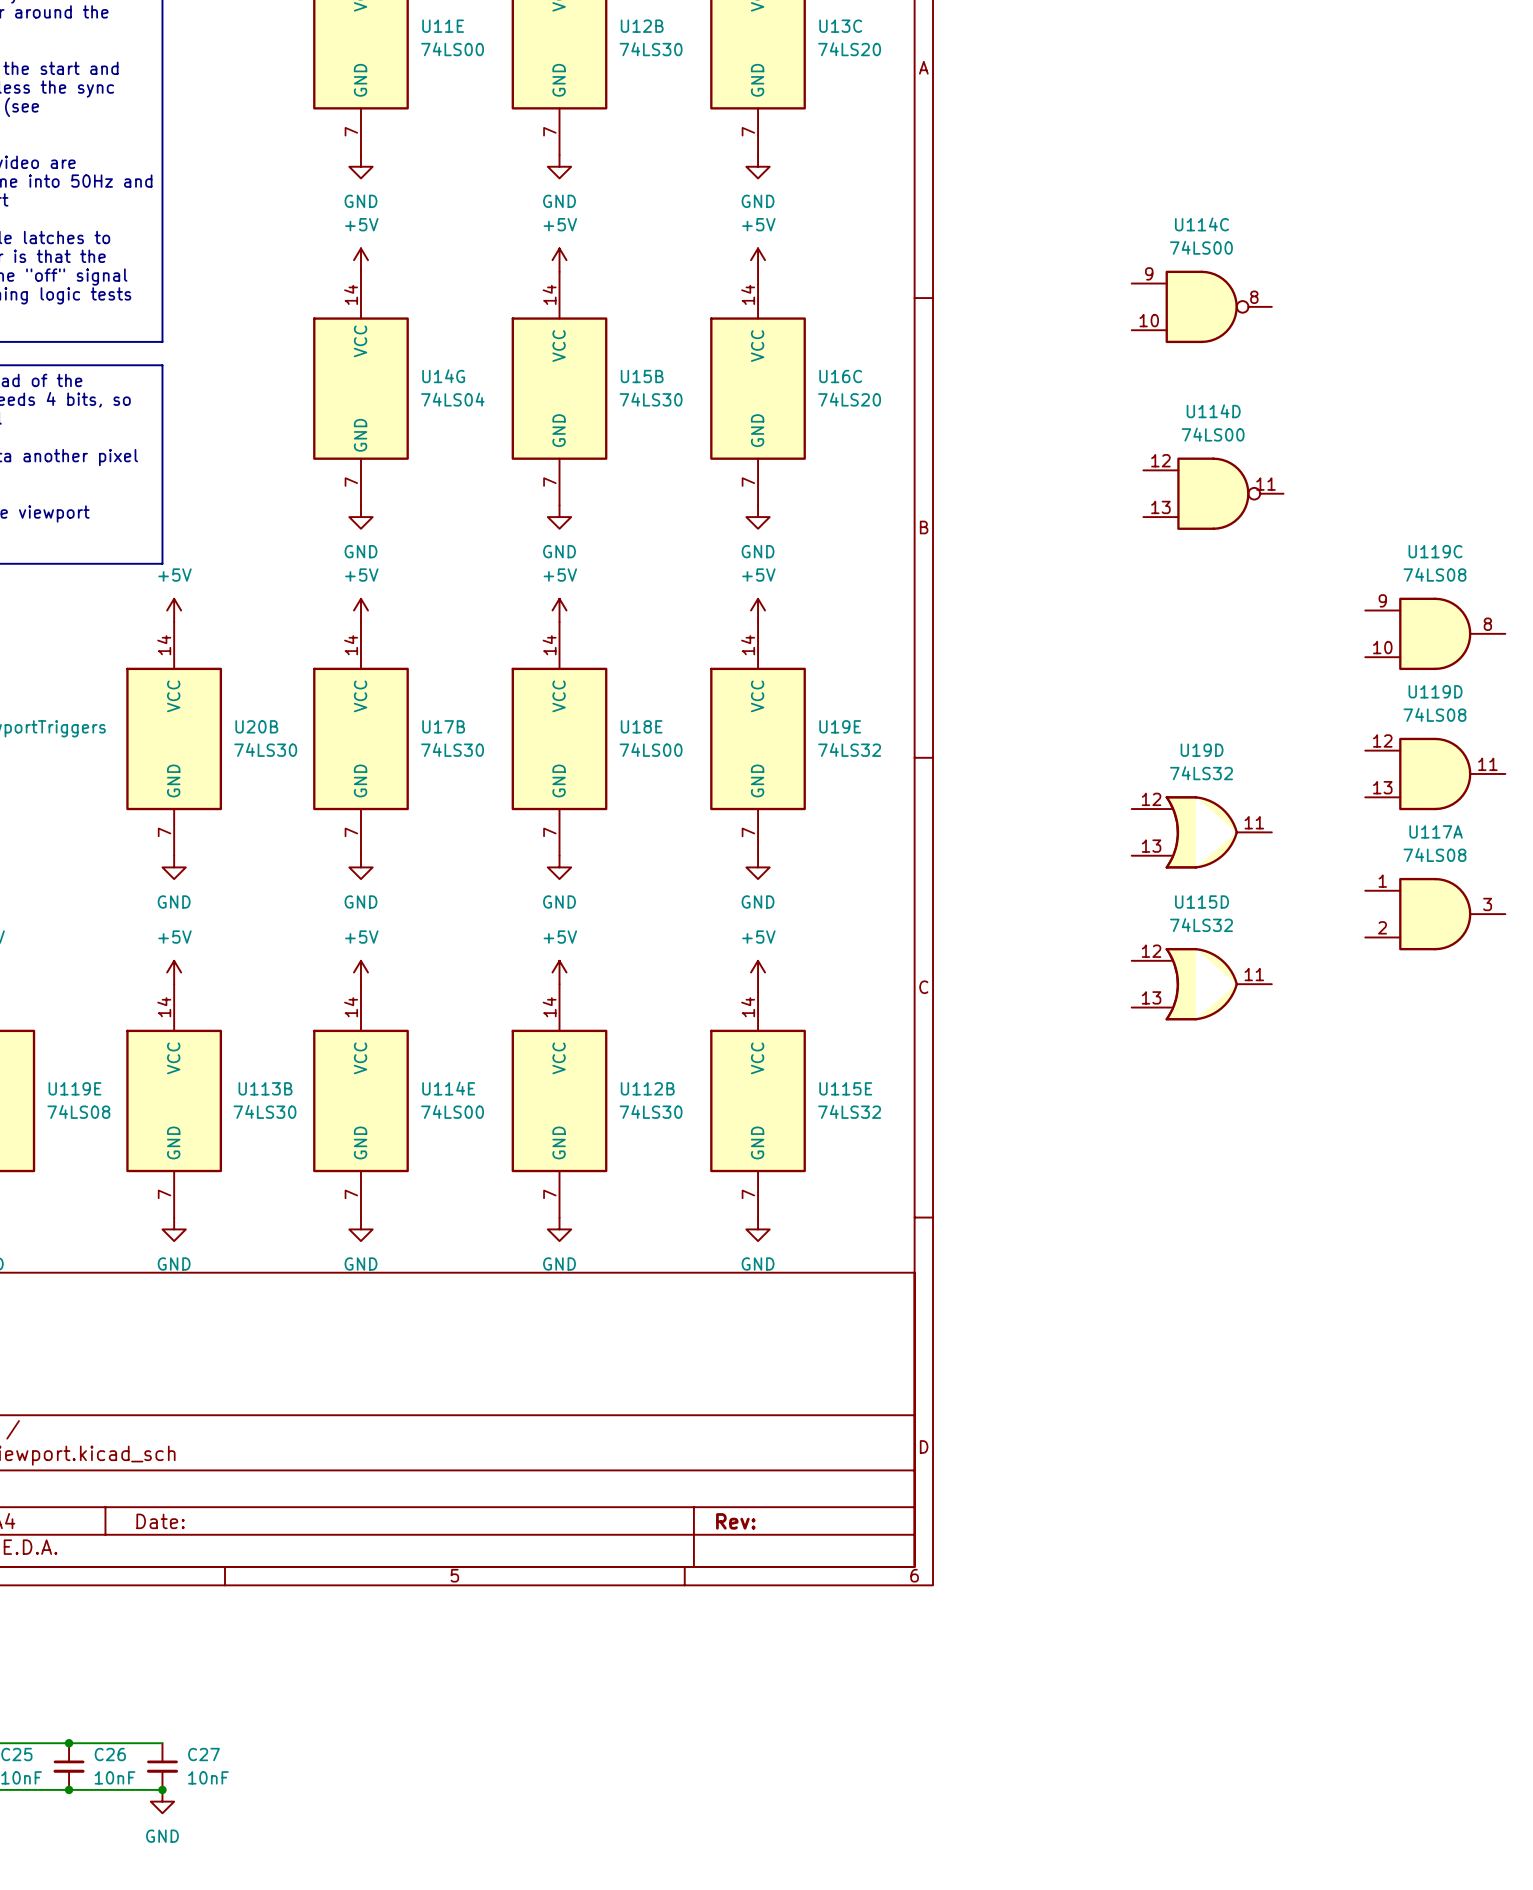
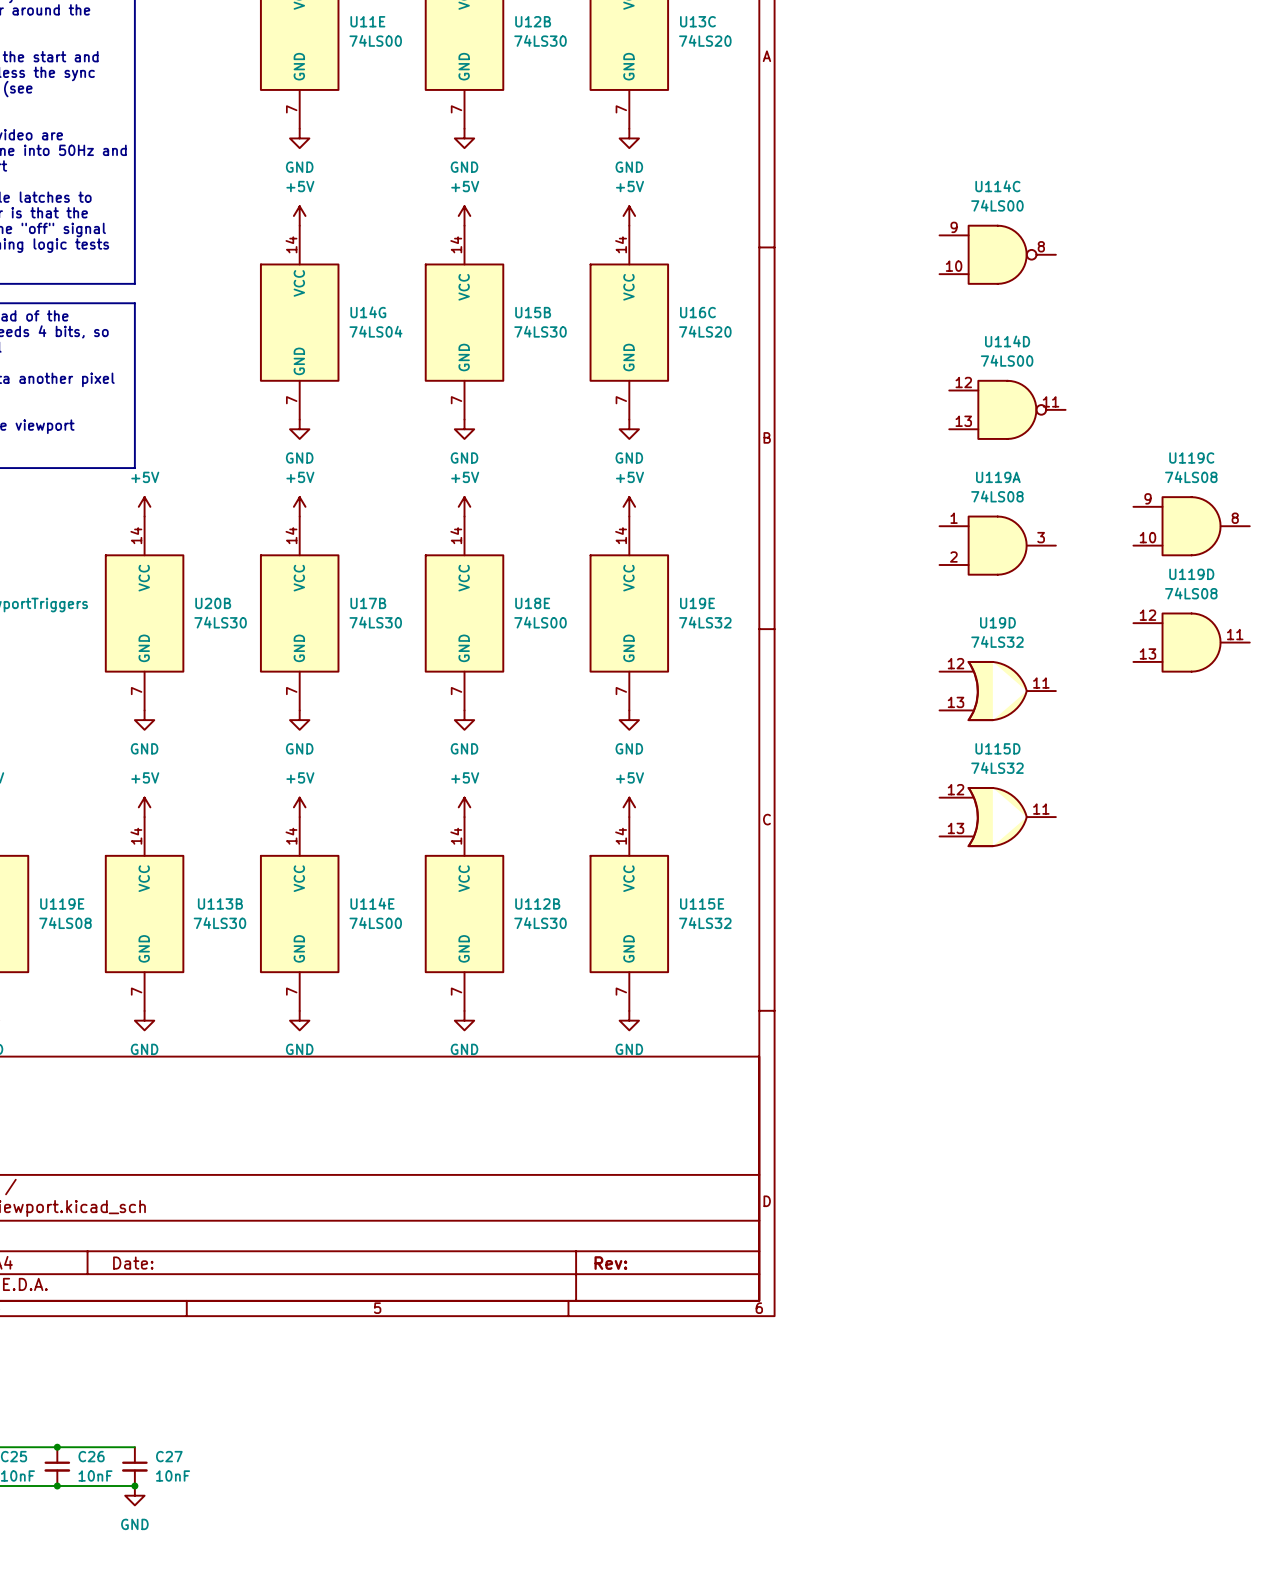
U119A: none -> 74LS08 (997, 545)
U117A: 74LS08 (1435, 914) -> none

